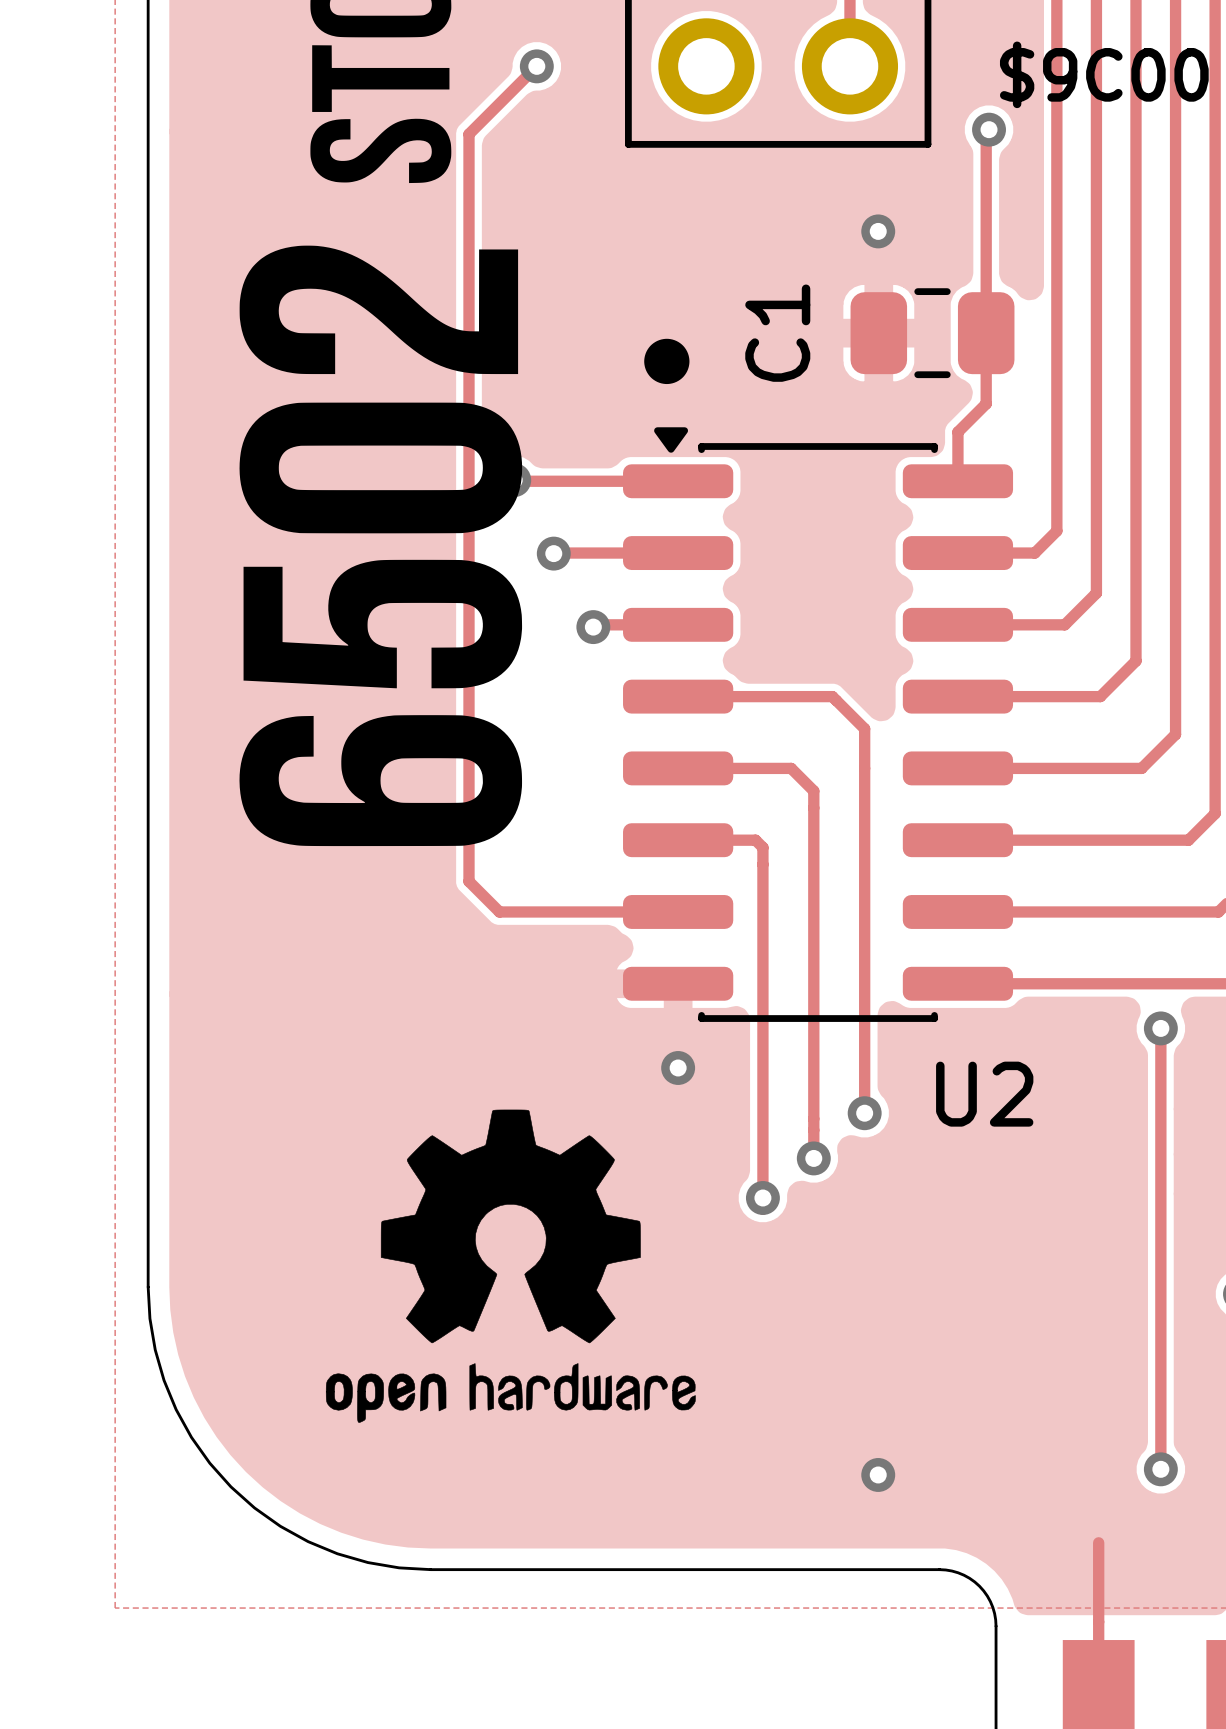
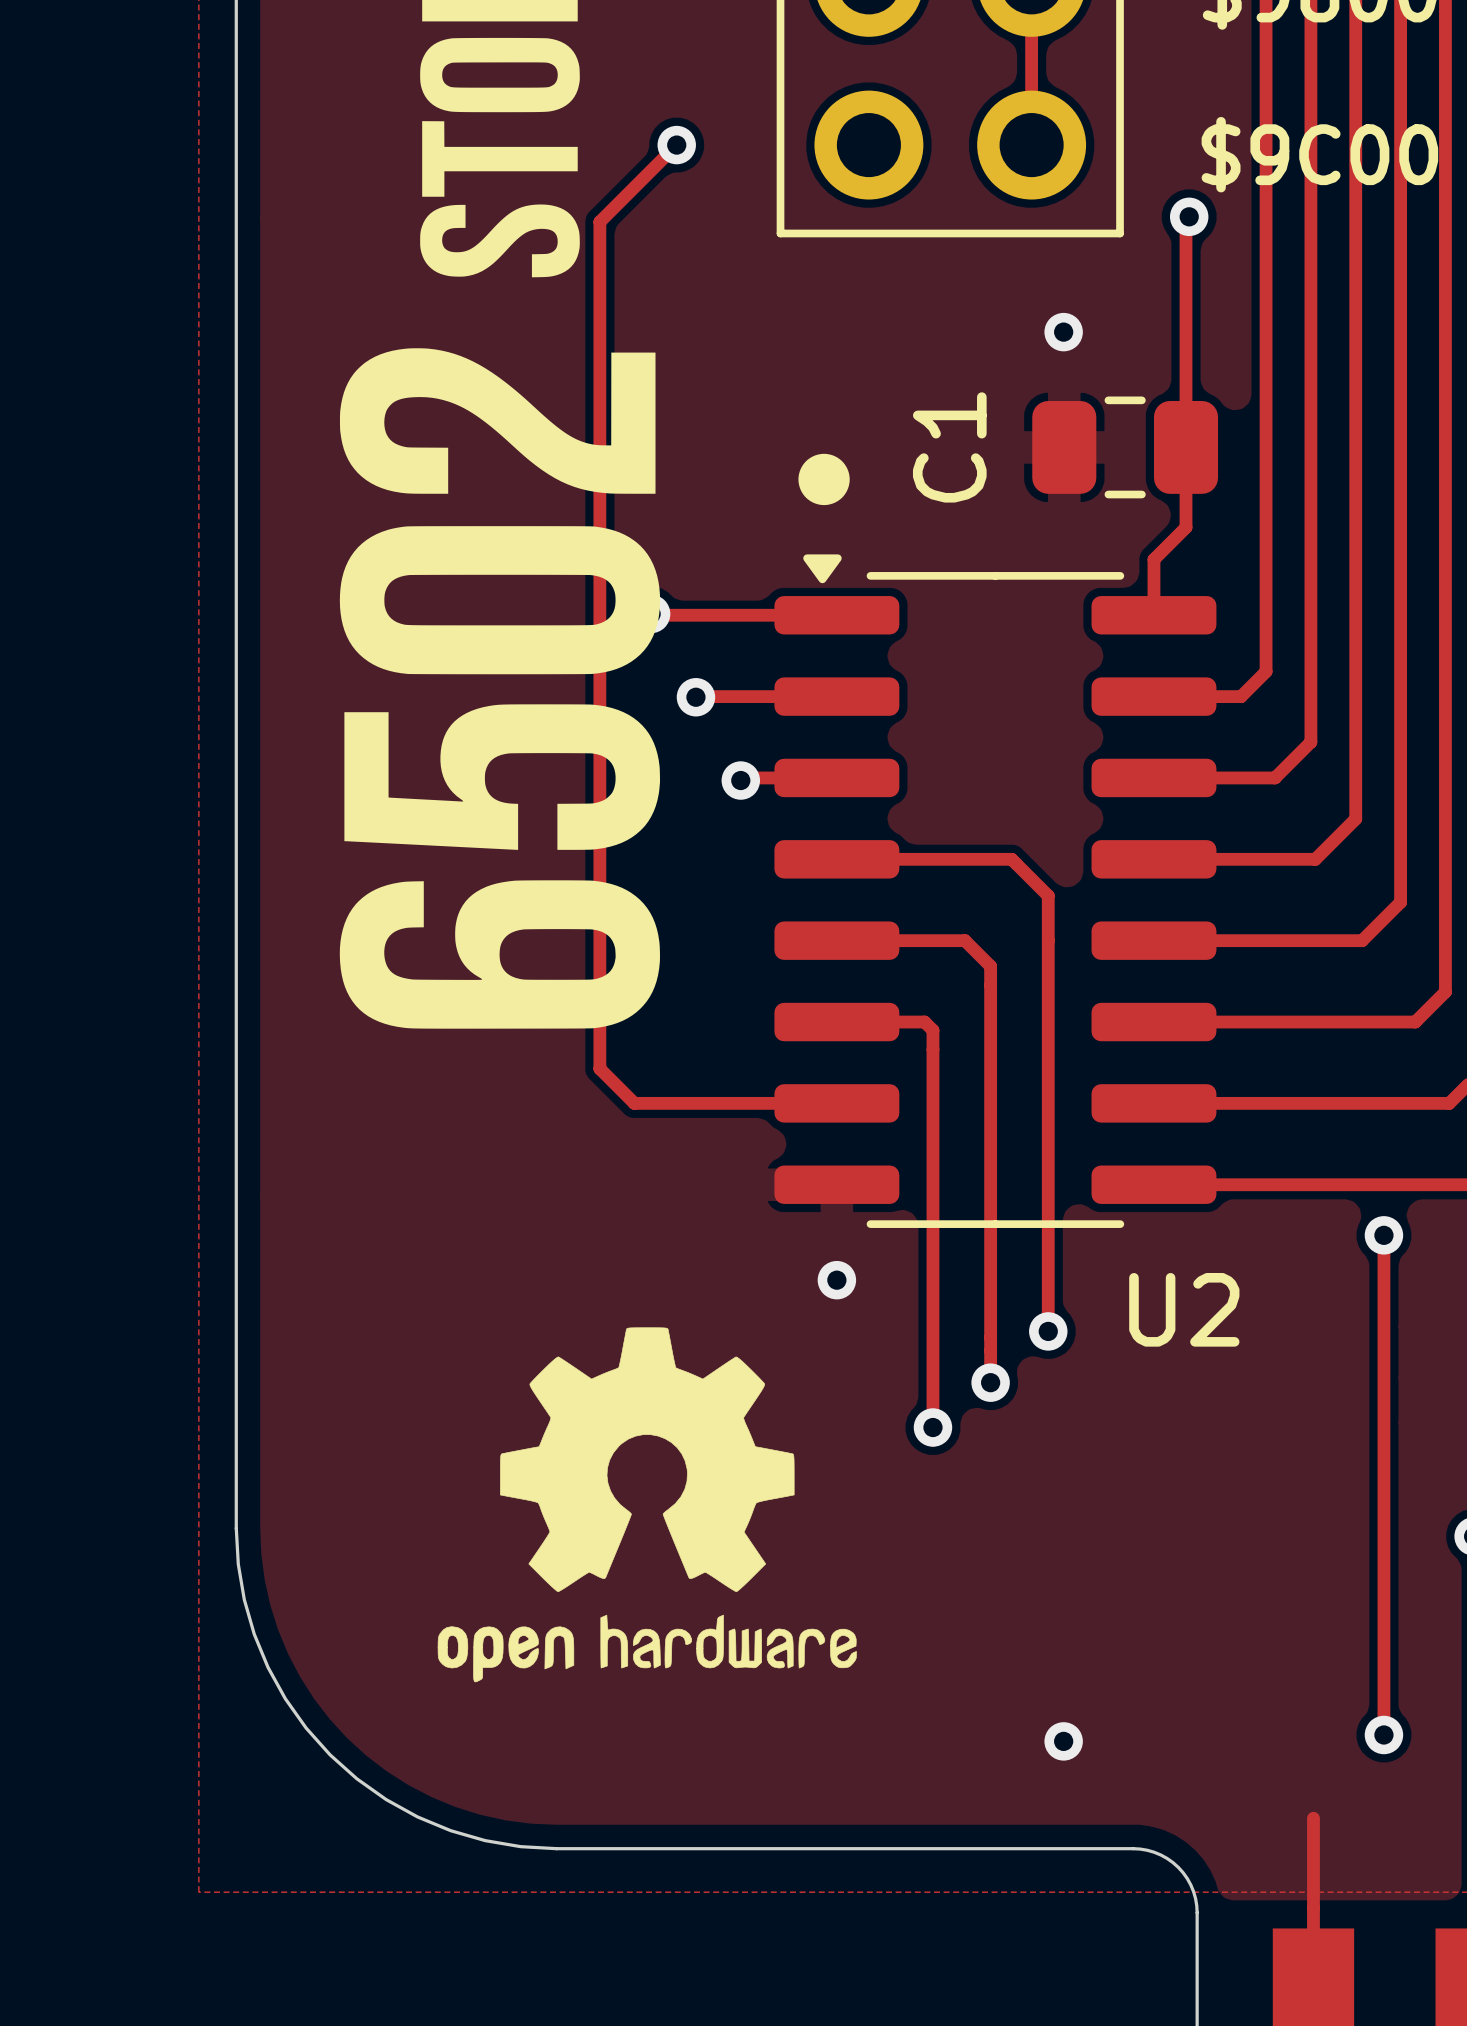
U2 footprint: [623, 427, 1014, 1022] -> [774, 554, 1217, 1228]

